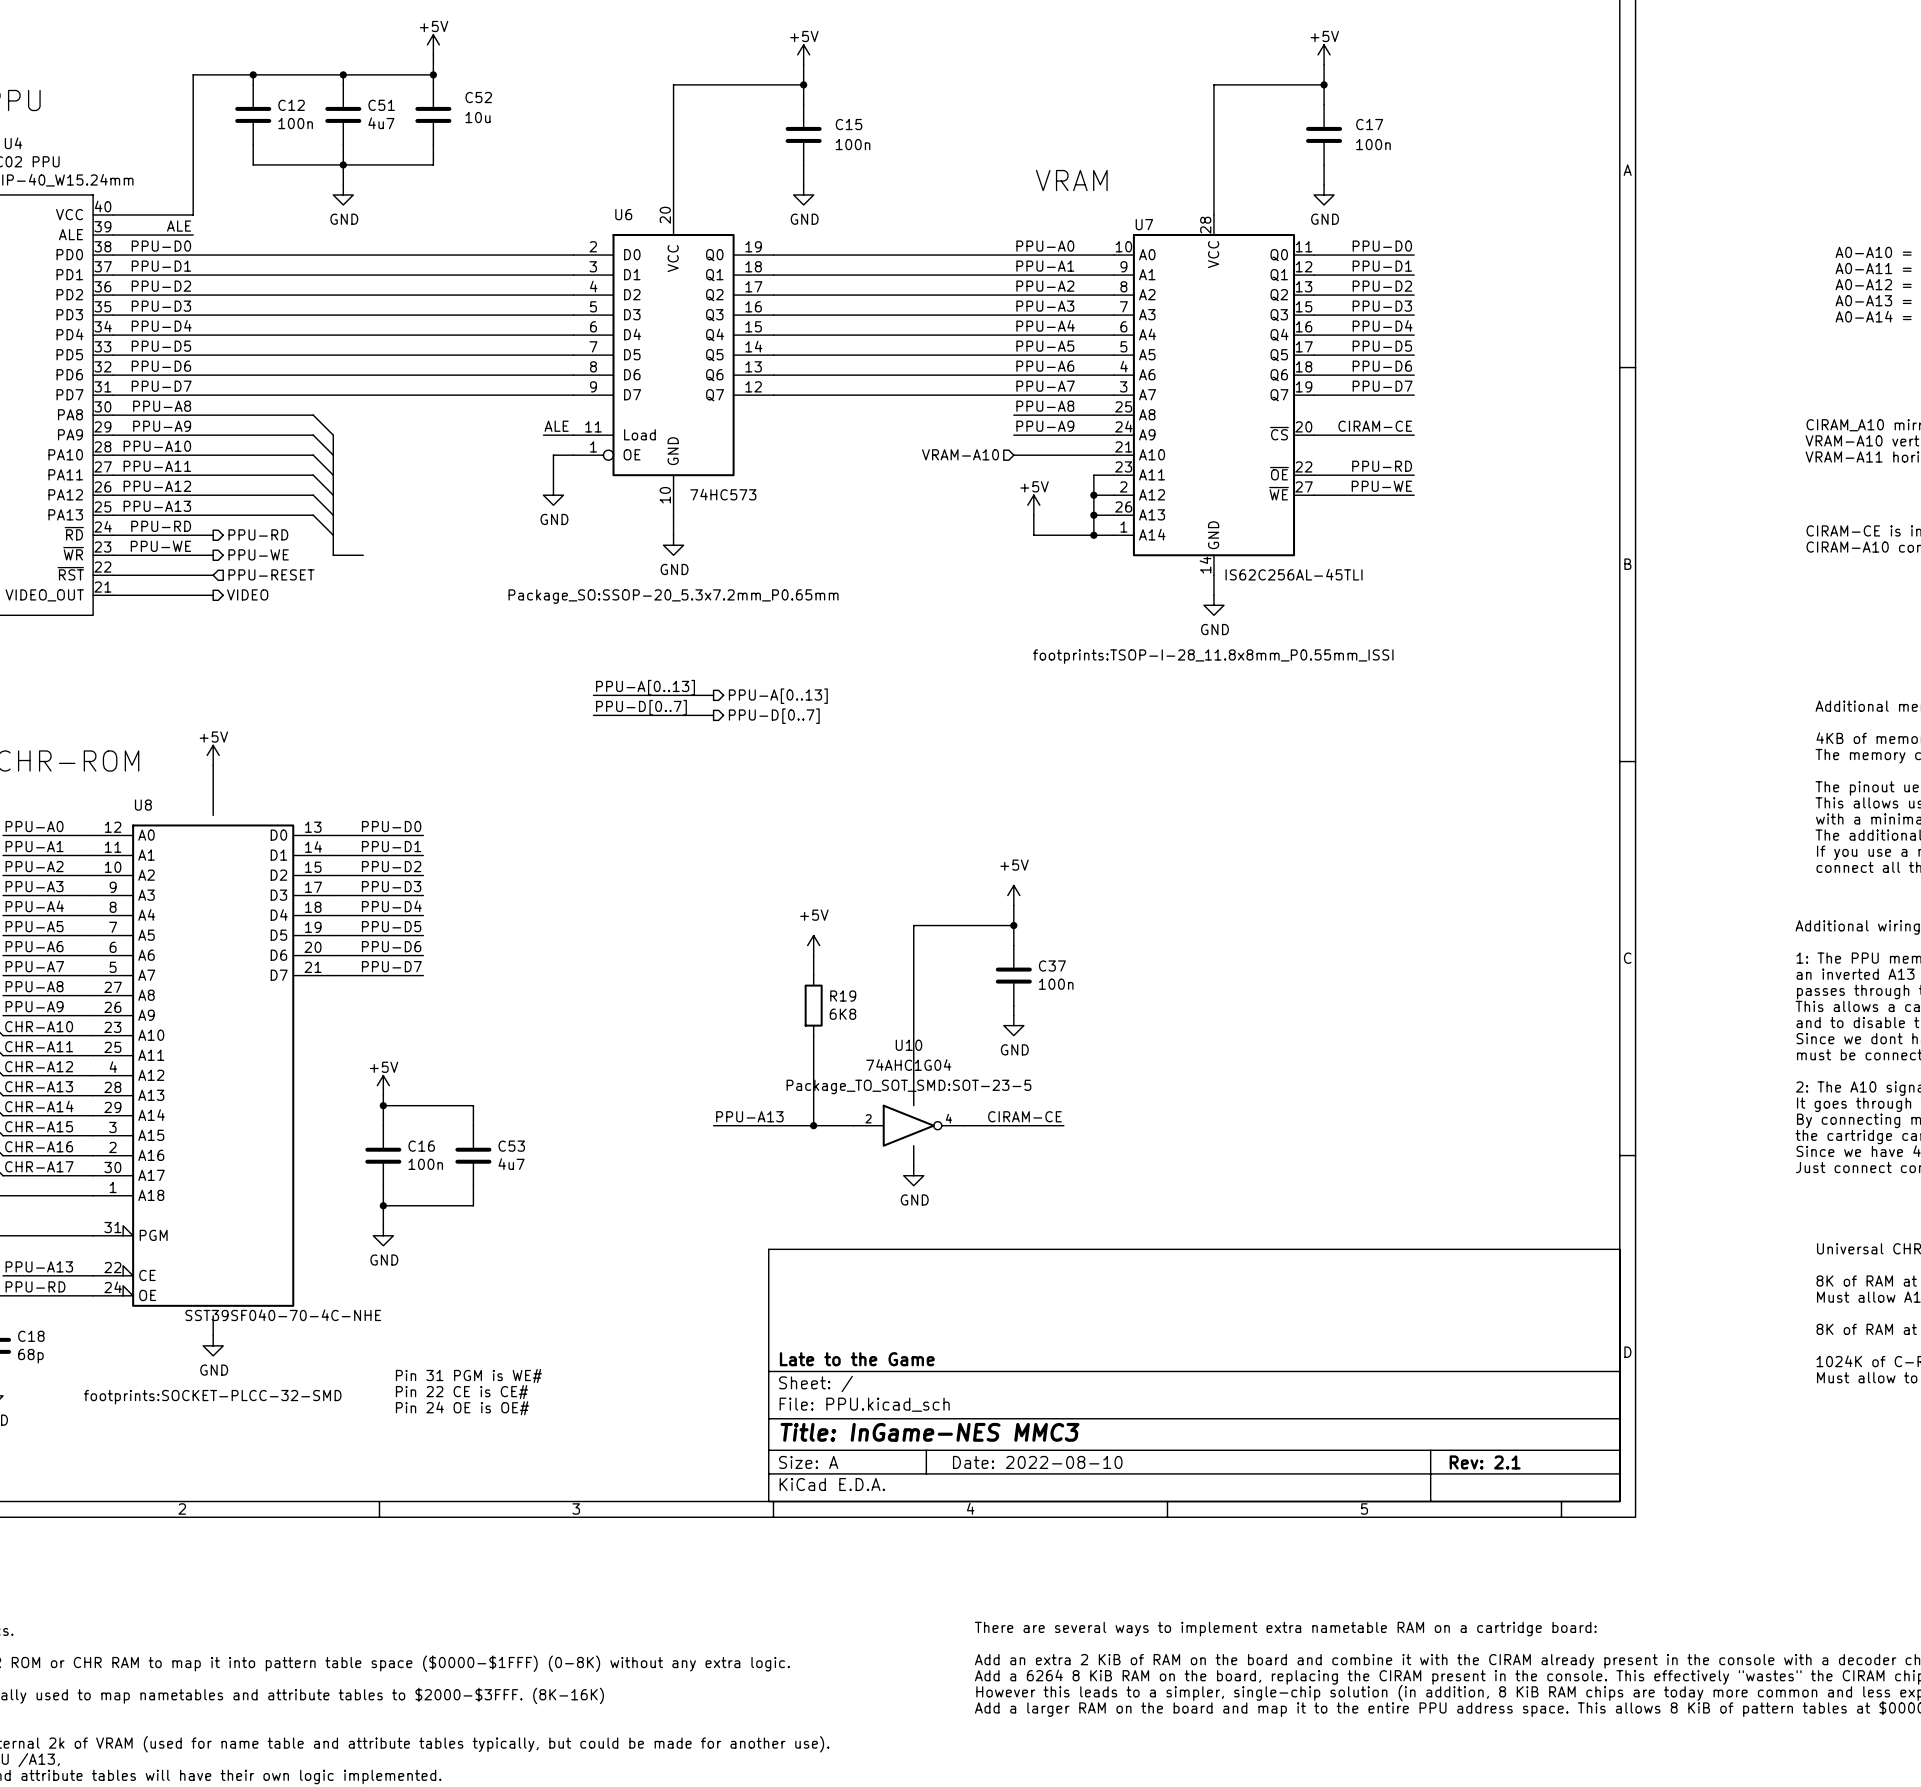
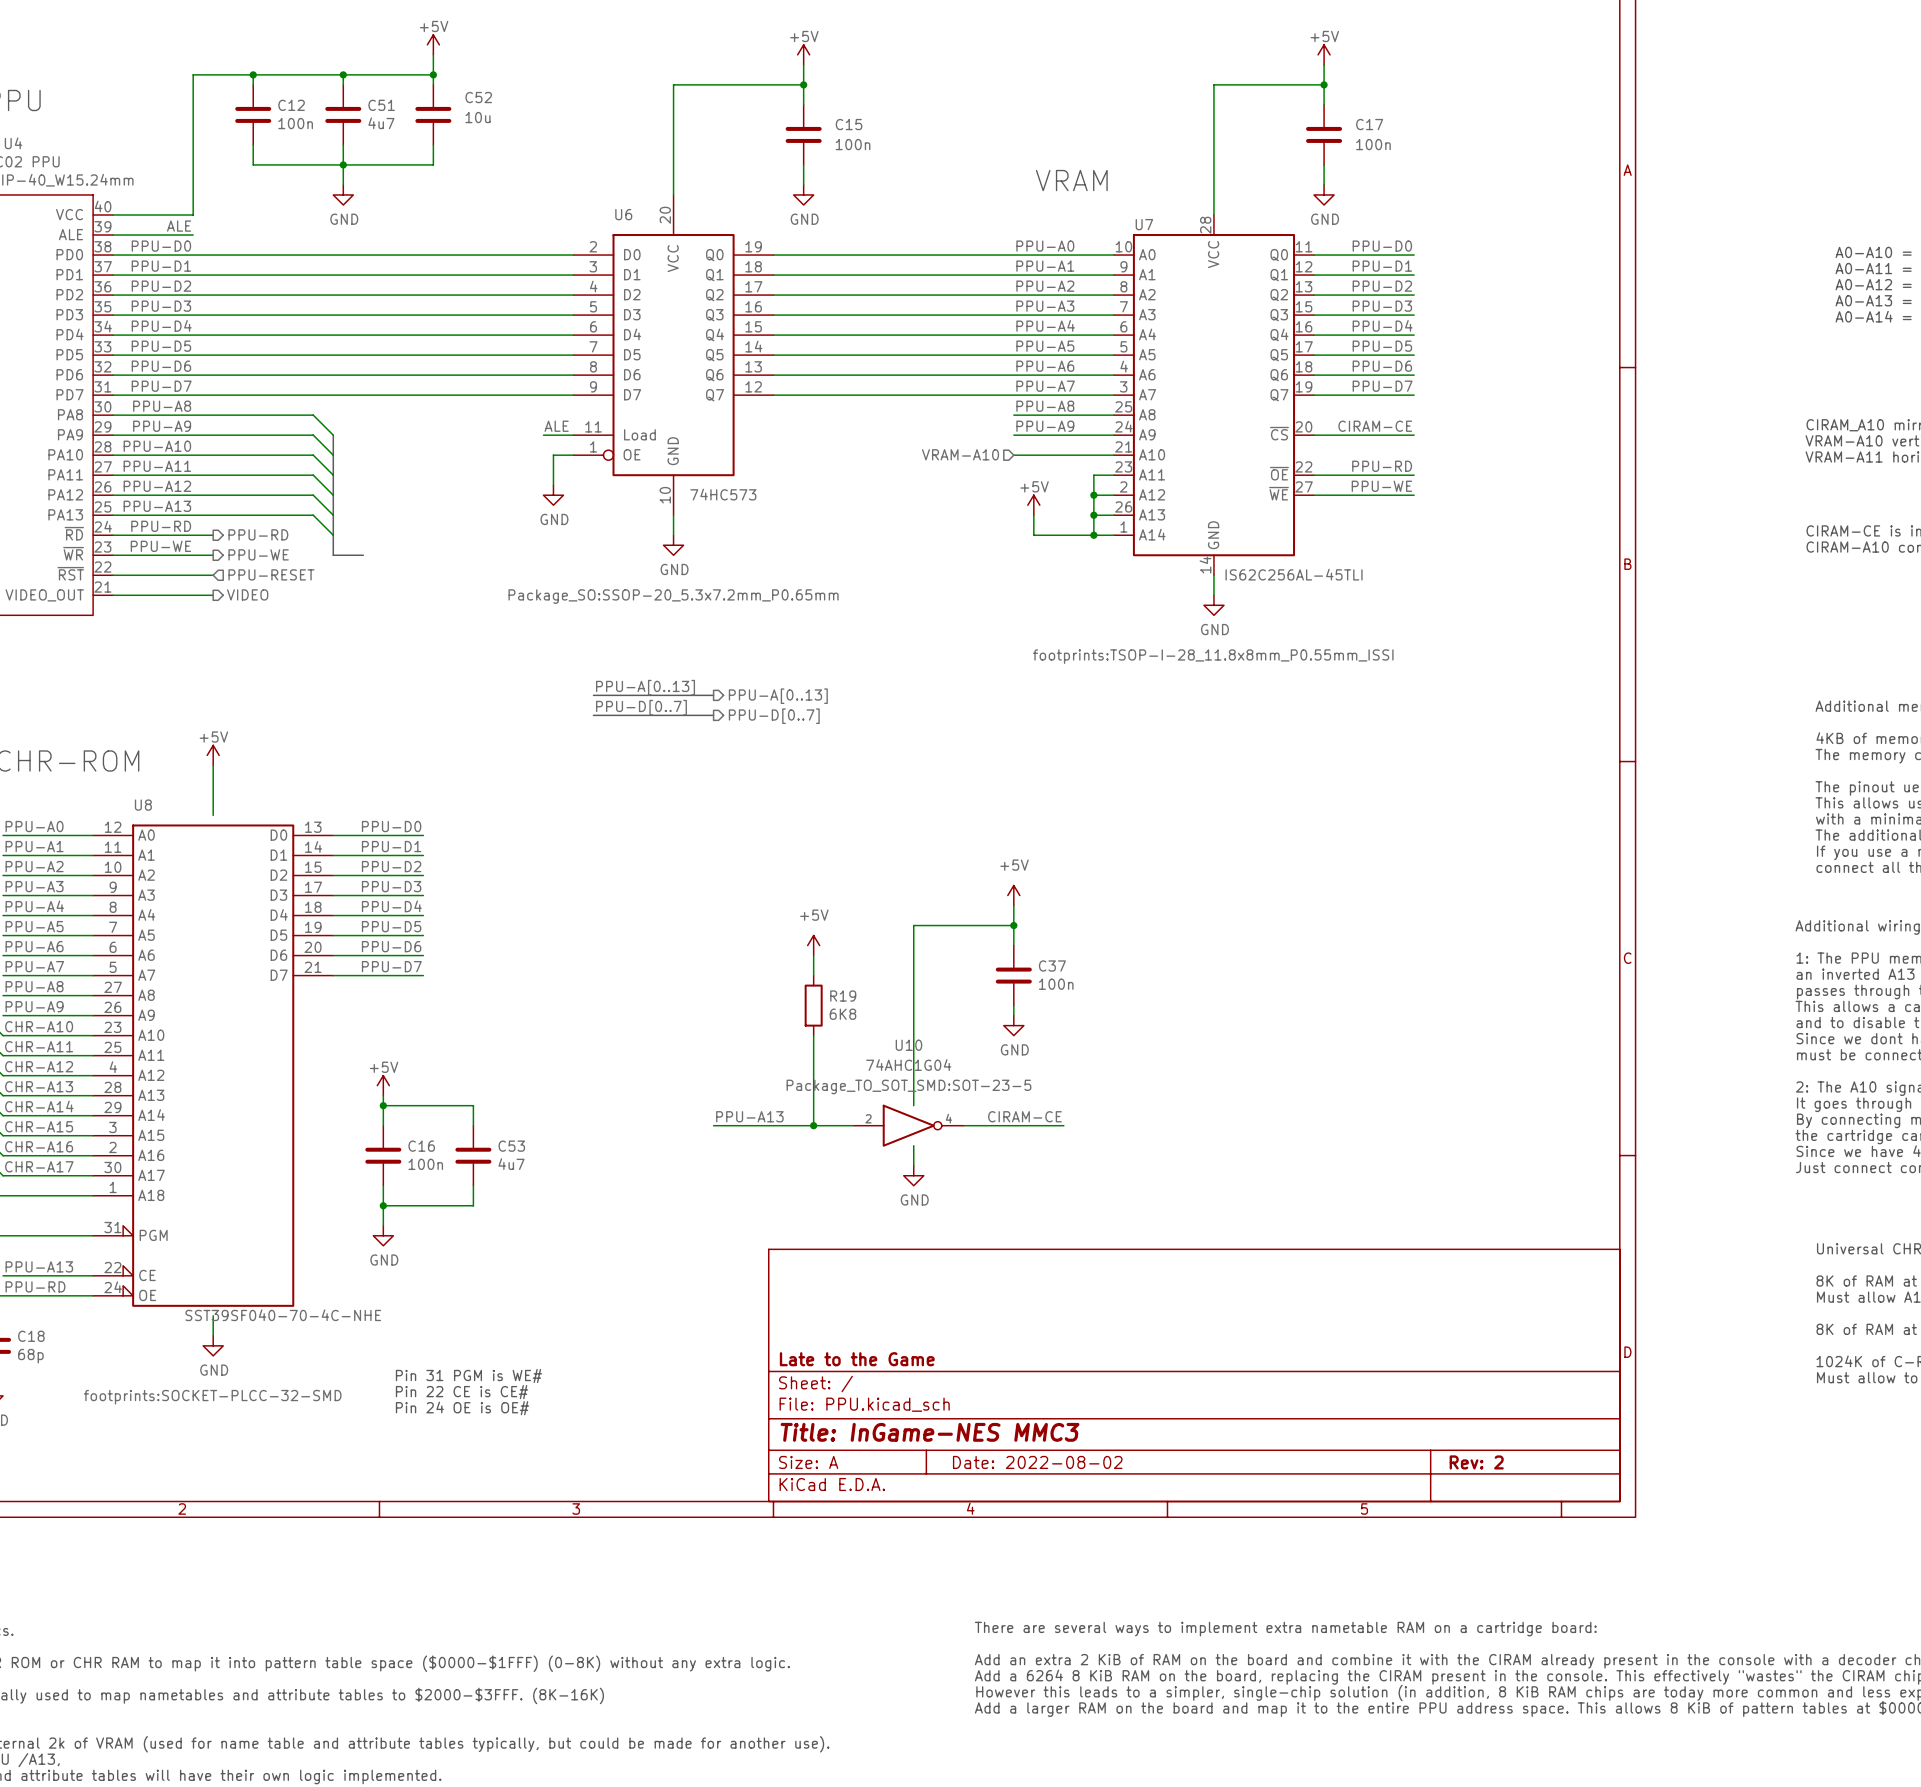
title block: Date: 2022-08-10 (1037, 1462) -> Date: 2022-08-02 (1037, 1462)
title block: Rev: 2.1 (1485, 1462) -> Rev: 2 (1476, 1462)

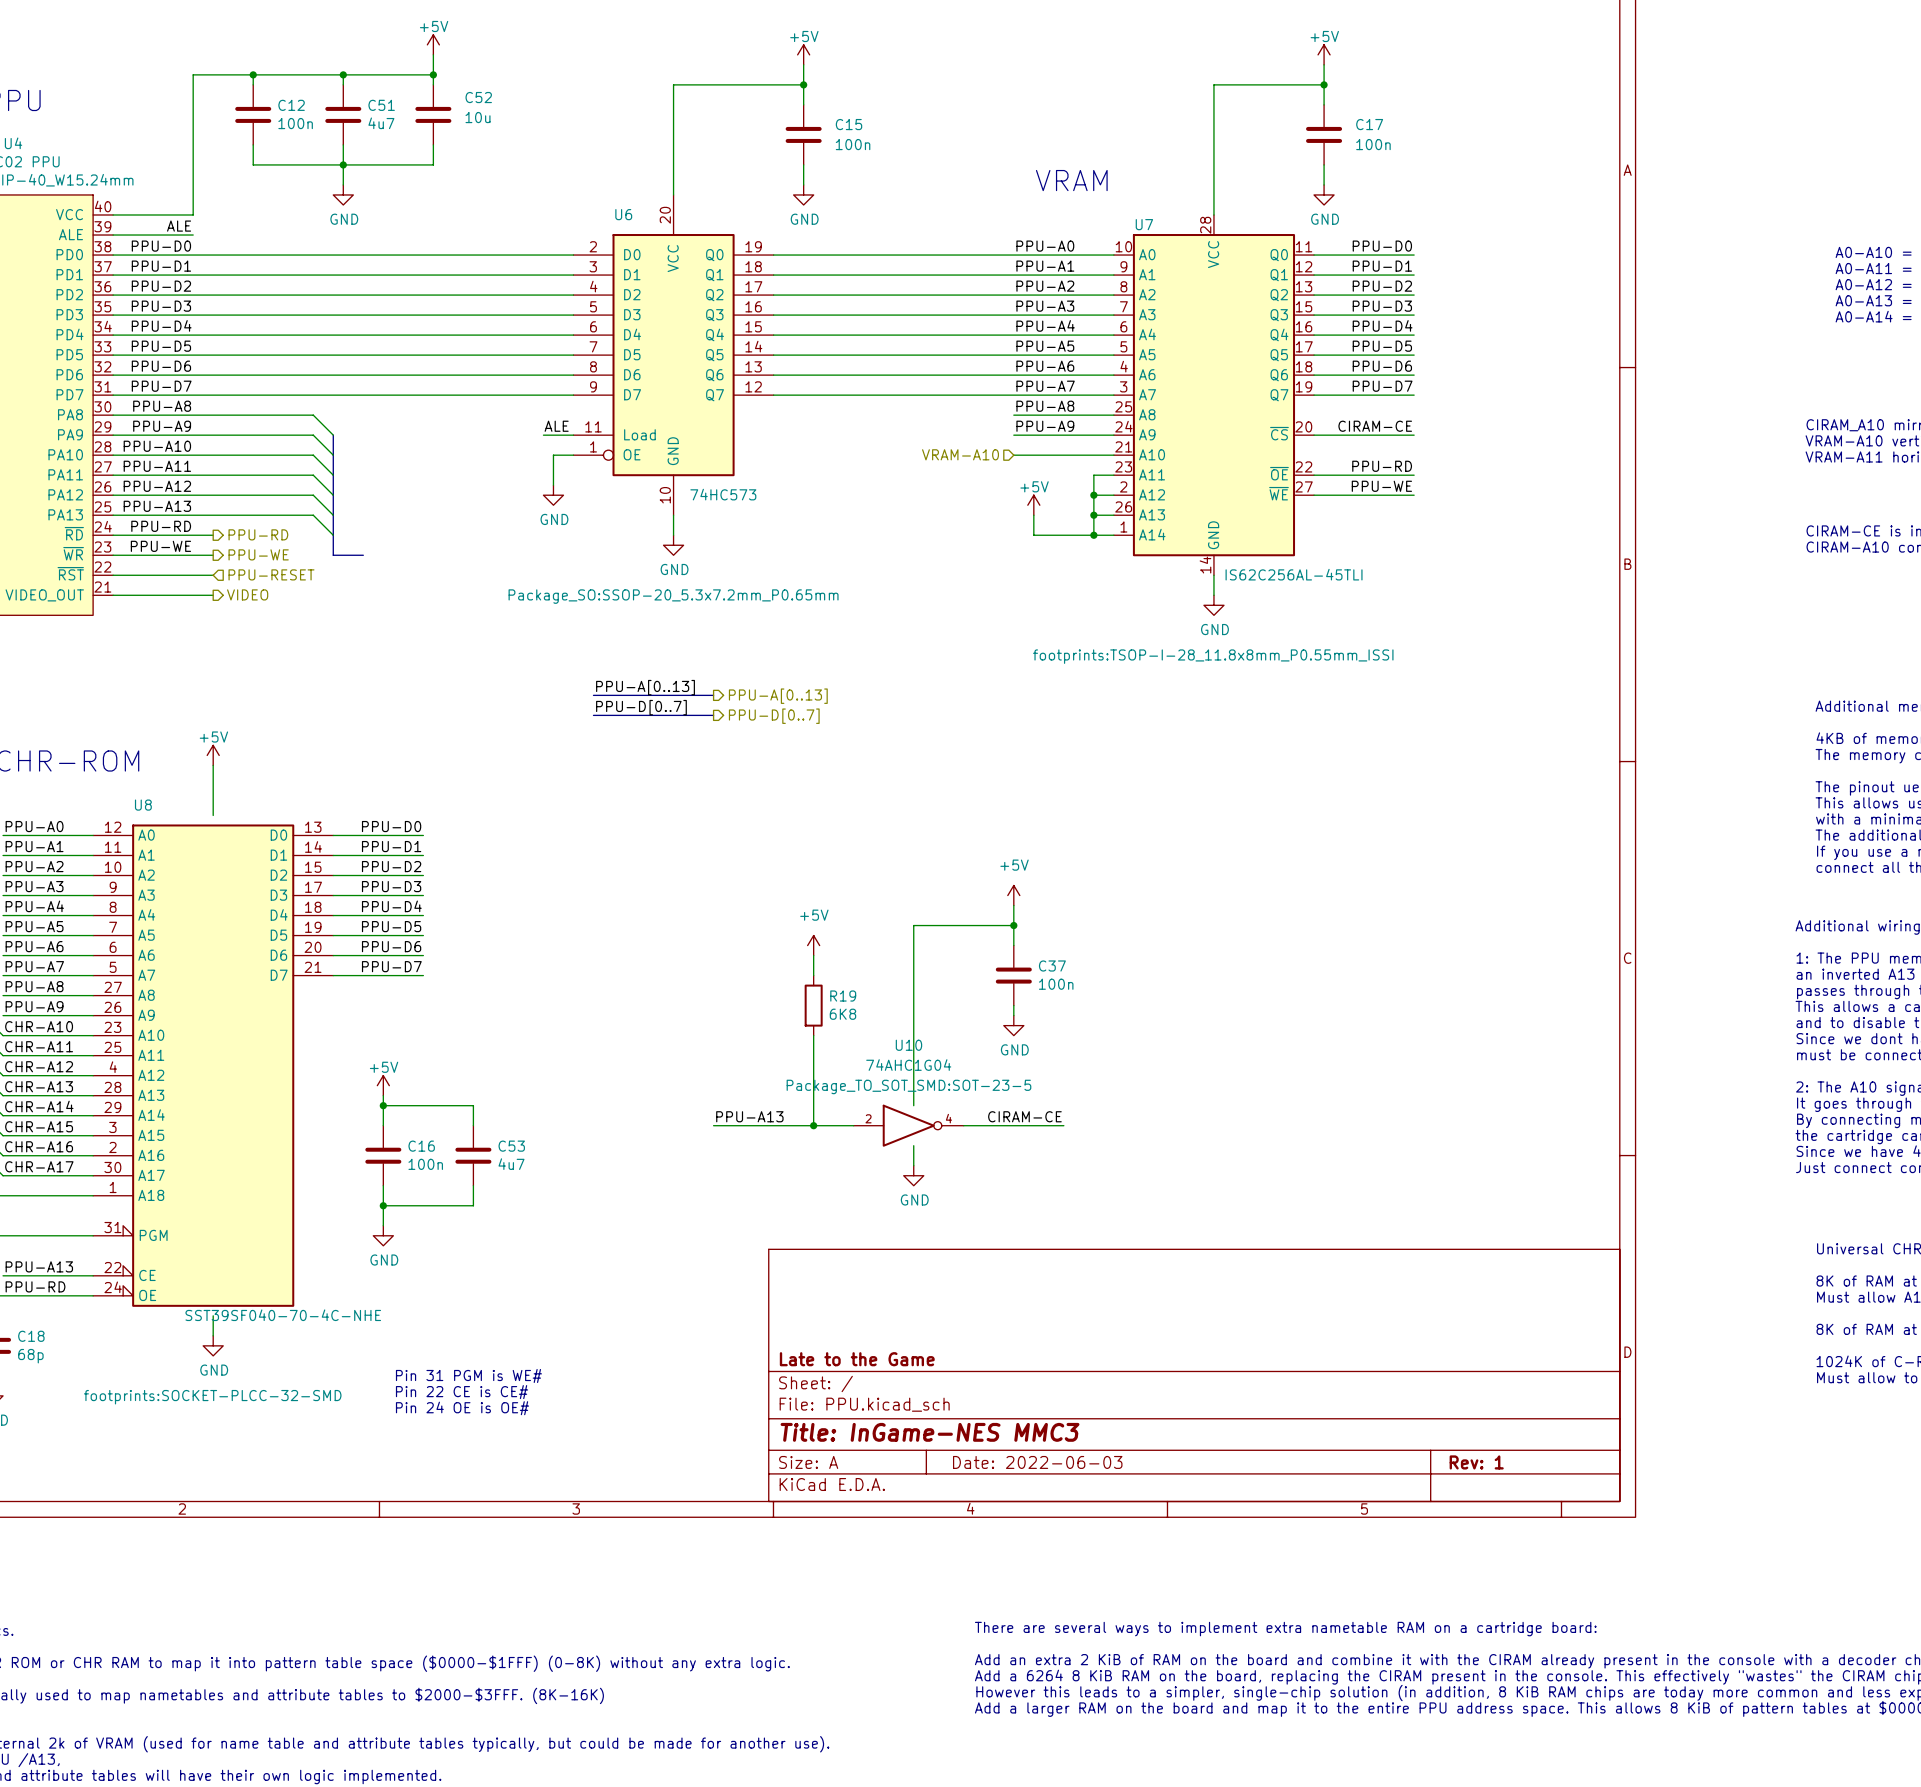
title block: Date: 2022-08-02 (1037, 1462) -> Date: 2022-06-03 (1037, 1462)
title block: Rev: 2 (1476, 1462) -> Rev: 1 (1476, 1462)

